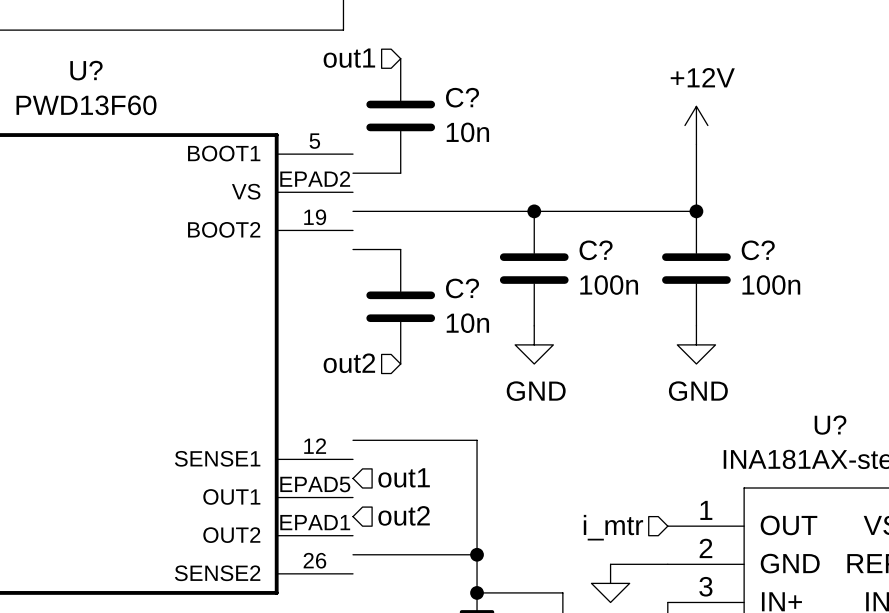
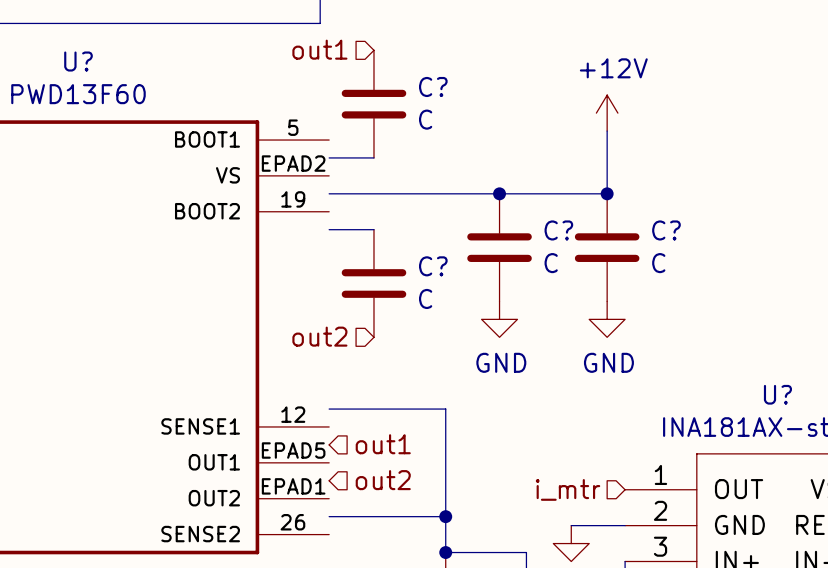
power symbol position: +12V (696, 125) -> +12V (607, 113)
C? value: 10n (467, 132) -> C (425, 119)
wire: (696, 144) (696, 211) (648, 211) -> (607, 131) (607, 193)
junction position: (696, 211) -> (607, 193)
C?: none -> C (607, 247)
C?: 100n (696, 268) -> none
C? value: 100n (609, 285) -> C (551, 263)
C? value: 10n (467, 323) -> C (425, 298)
power symbol position: GND (696, 344) -> GND (607, 319)

